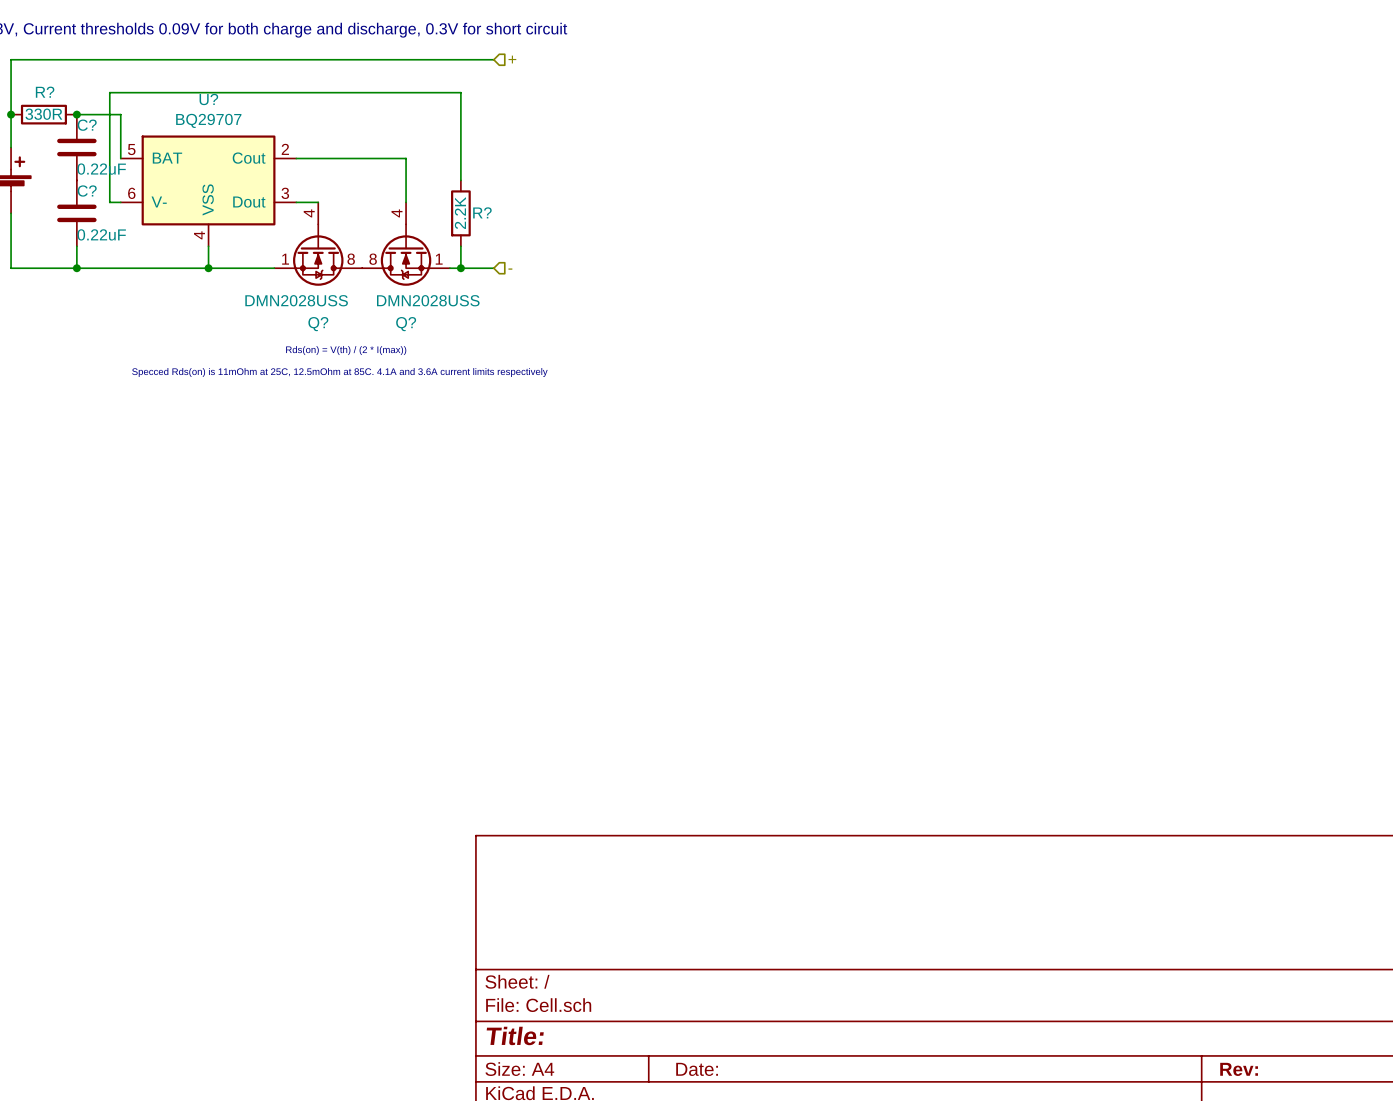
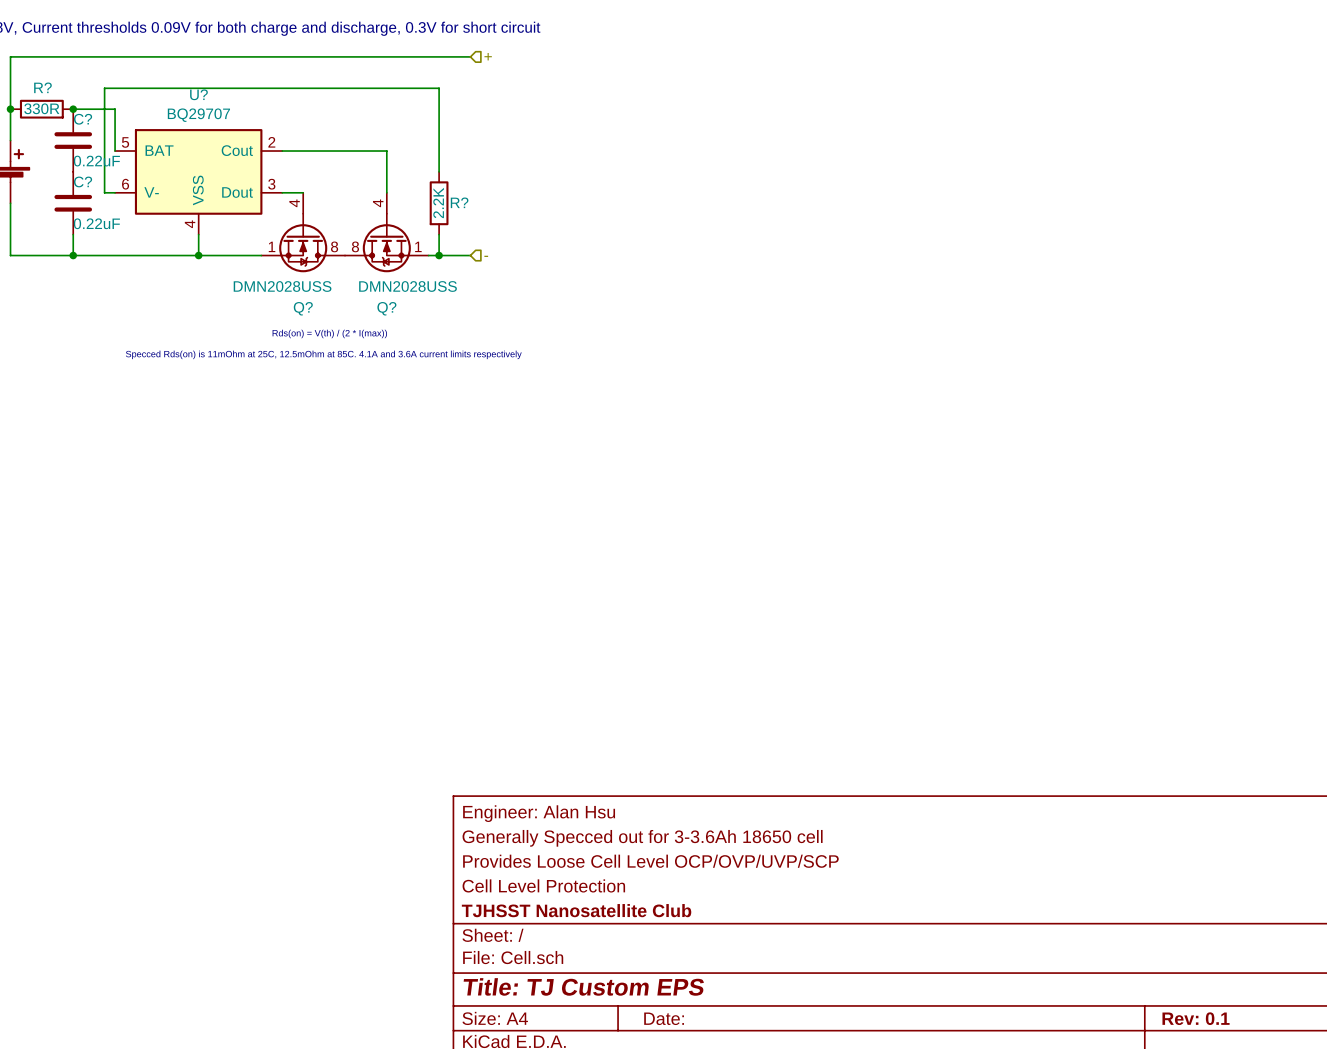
title block: none -> Engineer: Alan Hsu (539, 813)
title block: none -> Generally Specced out for 3-3.6Ah 18650 cell (642, 838)
title block: none -> Provides Loose Cell Level OCP/OVP/UVP/SCP (650, 861)
title block: none -> Cell Level Protection (543, 885)
title block: none -> TJHSST Nanosatellite Club (576, 910)
title block: Title: (515, 1035) -> Title: TJ Custom EPS (583, 986)
title block: Rev: (1239, 1069) -> Rev: 0.1 (1196, 1018)

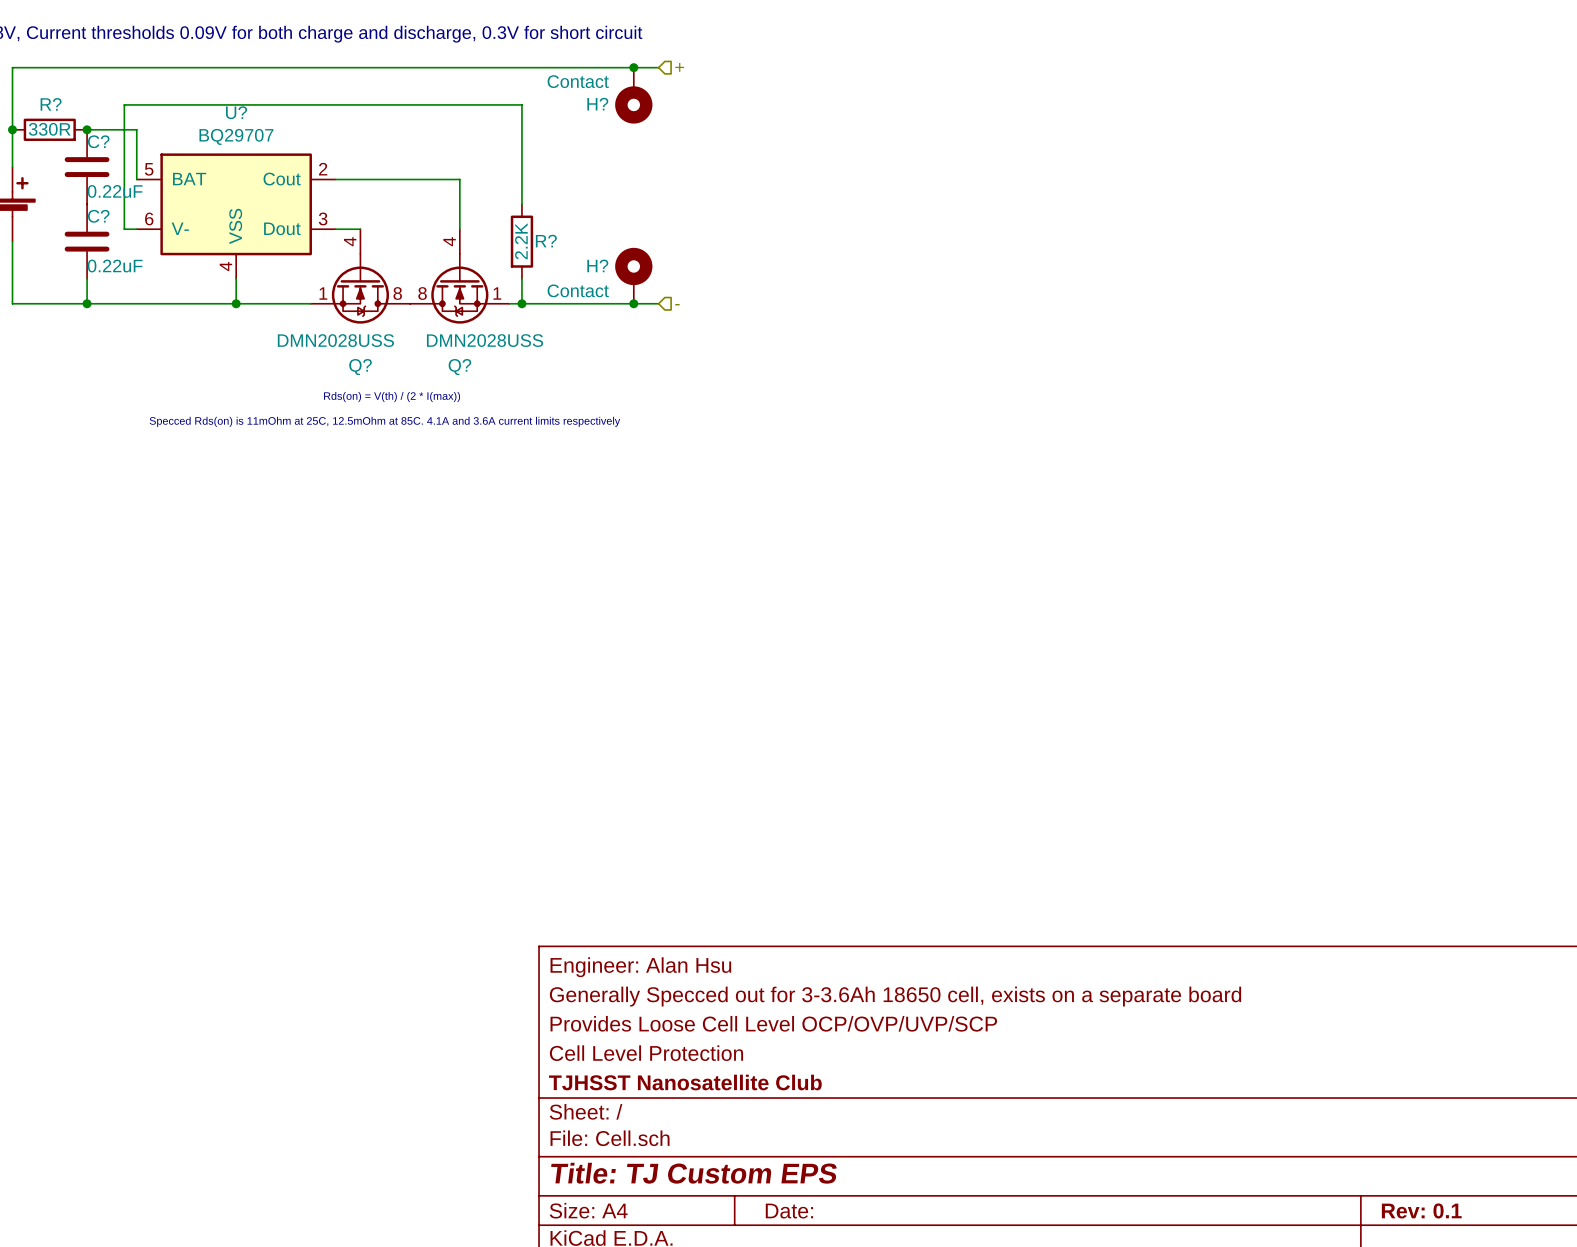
wire: none -> (559, 67) (658, 67)
hierarchical label position: + (488, 56) -> + (679, 67)
junction: none -> (633, 67)
H?: none -> Contact (633, 95)
H?: none -> Contact (633, 275)
wire: none -> (559, 303) (658, 303)
junction: none -> (633, 303)
hierarchical label position: - (486, 256) -> - (677, 304)
title block: Generally Specced out for 3-3.6Ah 18650 cell (642, 838) -> Generally Specced out for 3-3.6Ah 18650 cell, exists on a separate board (895, 996)

